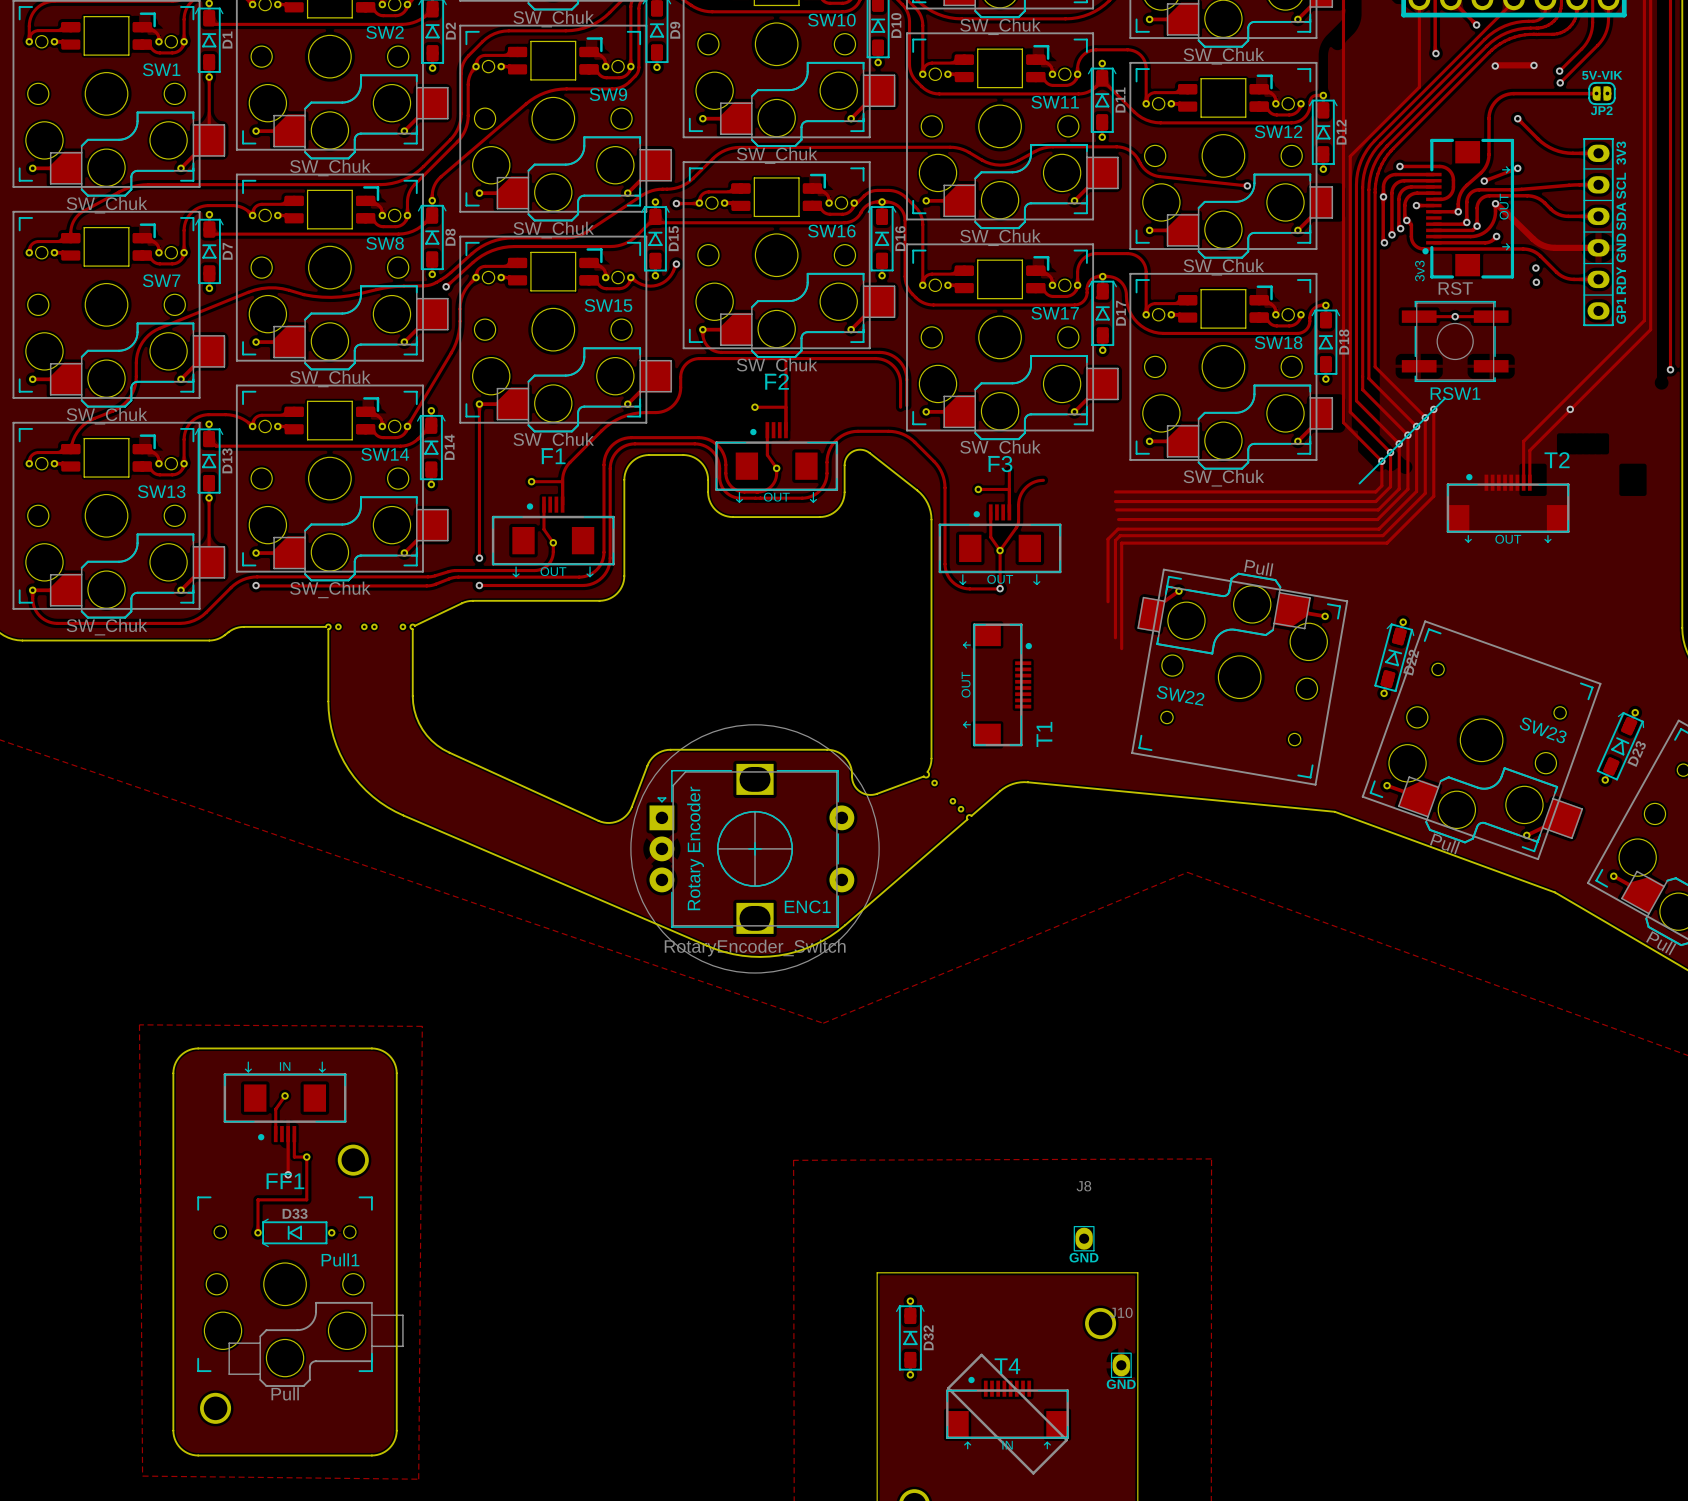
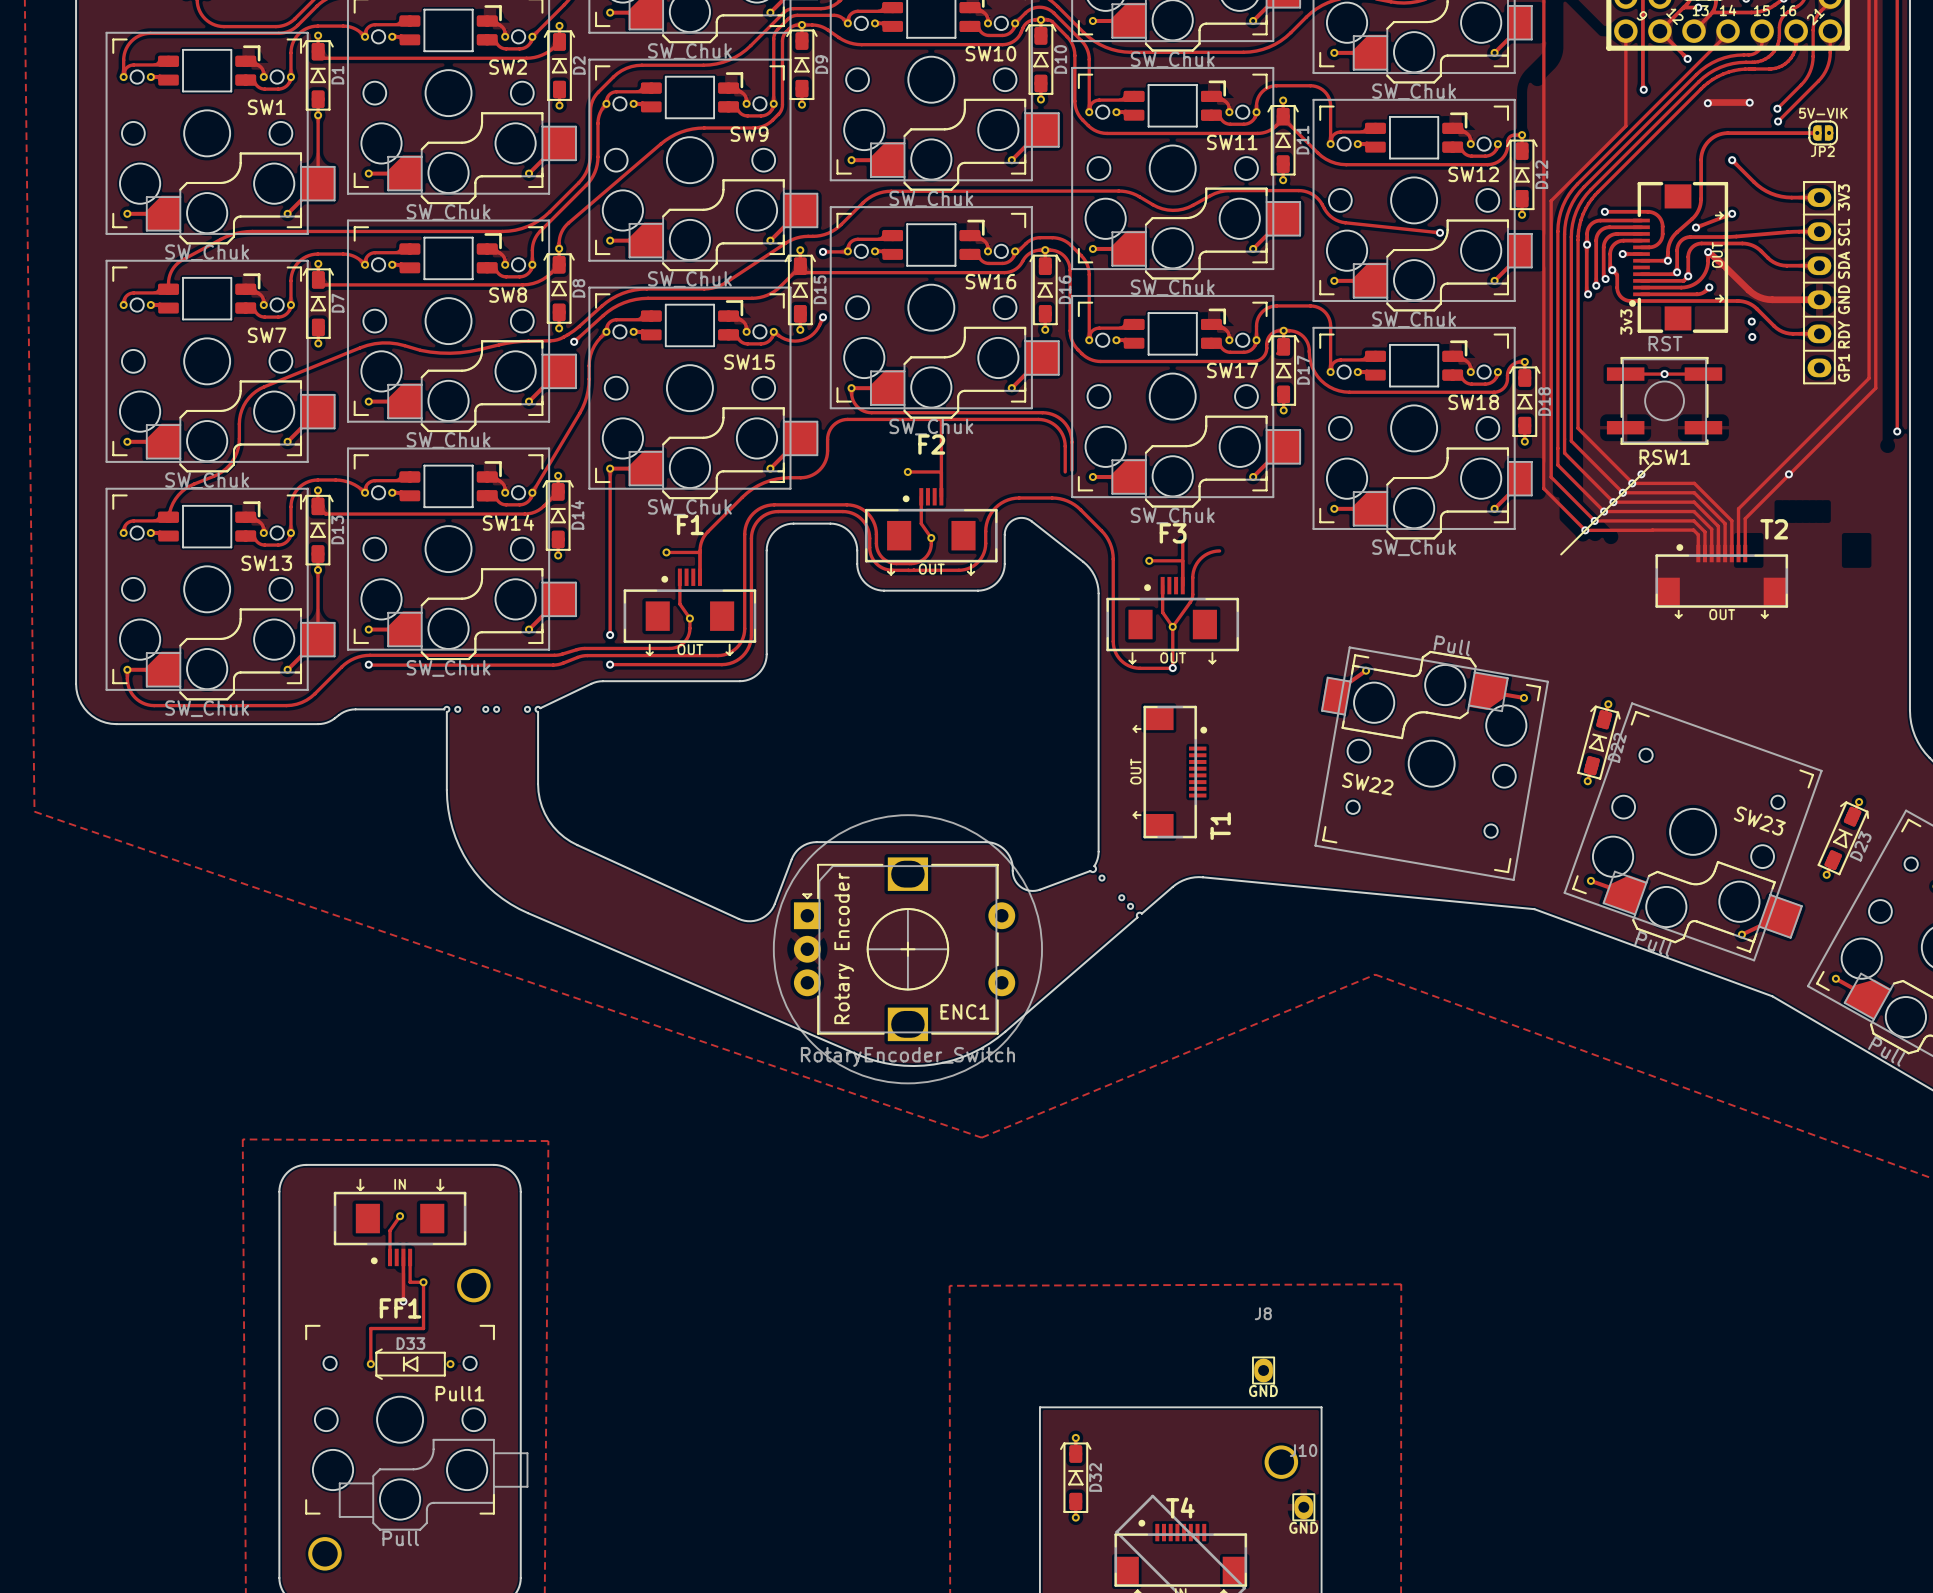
track: (1433, 409) (1433, 496) (1386, 543) (1121, 543) (1121, 648) -> none
track: (1425, 417) (1425, 493) (1382, 535) (1120, 535) (1115, 540) (1115, 637) -> (1632, 483) (1694, 483) (1731, 520) (1731, 553)
track: (1416, 426) (1416, 491) (1378, 529) (1118, 529) (1108, 539) (1108, 601) -> (1622, 492) (1694, 492) (1725, 523) (1725, 553)
track: (1407, 435) (1407, 489) (1377, 519) (1118, 519) -> (1613, 502) (1694, 502) (1718, 526) (1718, 553)
track: (1399, 443) (1399, 488) (1378, 509) (1116, 509) -> (1604, 511) (1694, 511) (1711, 529) (1711, 553)
track: (1390, 452) (1390, 486) (1375, 501) (1115, 501) -> (1594, 520) (1693, 520) (1704, 531) (1704, 553)
track: (1381, 461) (1381, 485) (1375, 491) (1115, 491) -> (1585, 530) (1693, 530) (1698, 534) (1698, 553)

